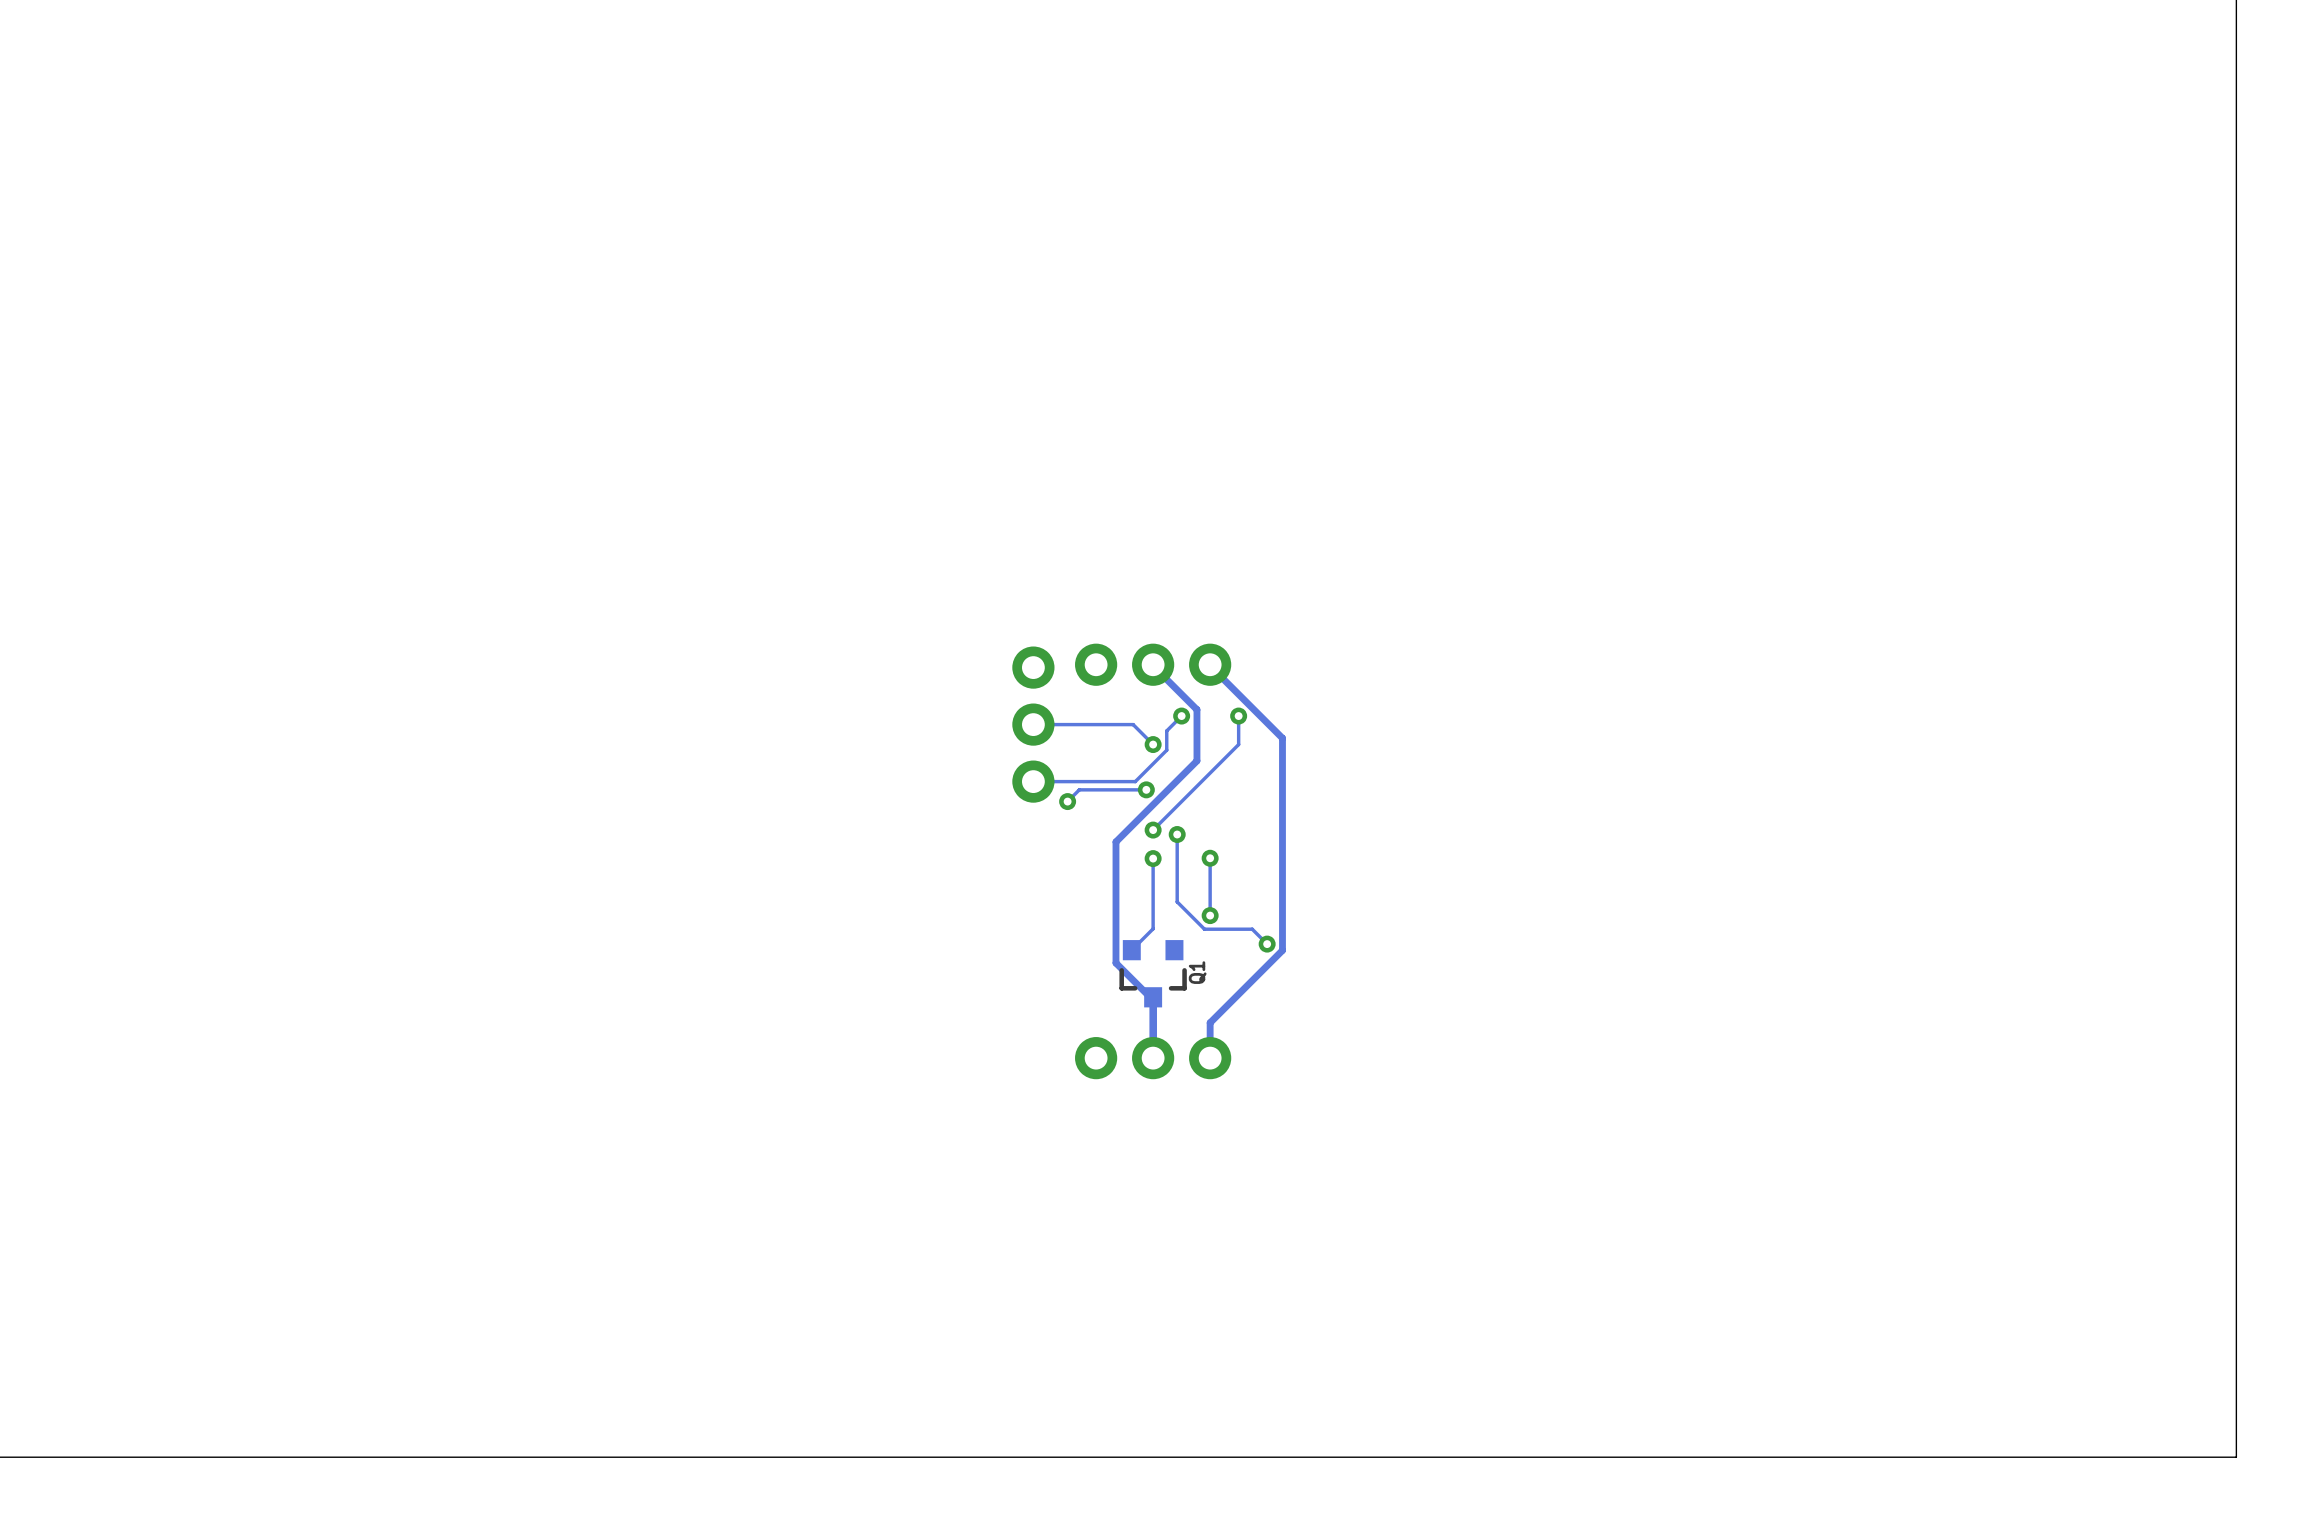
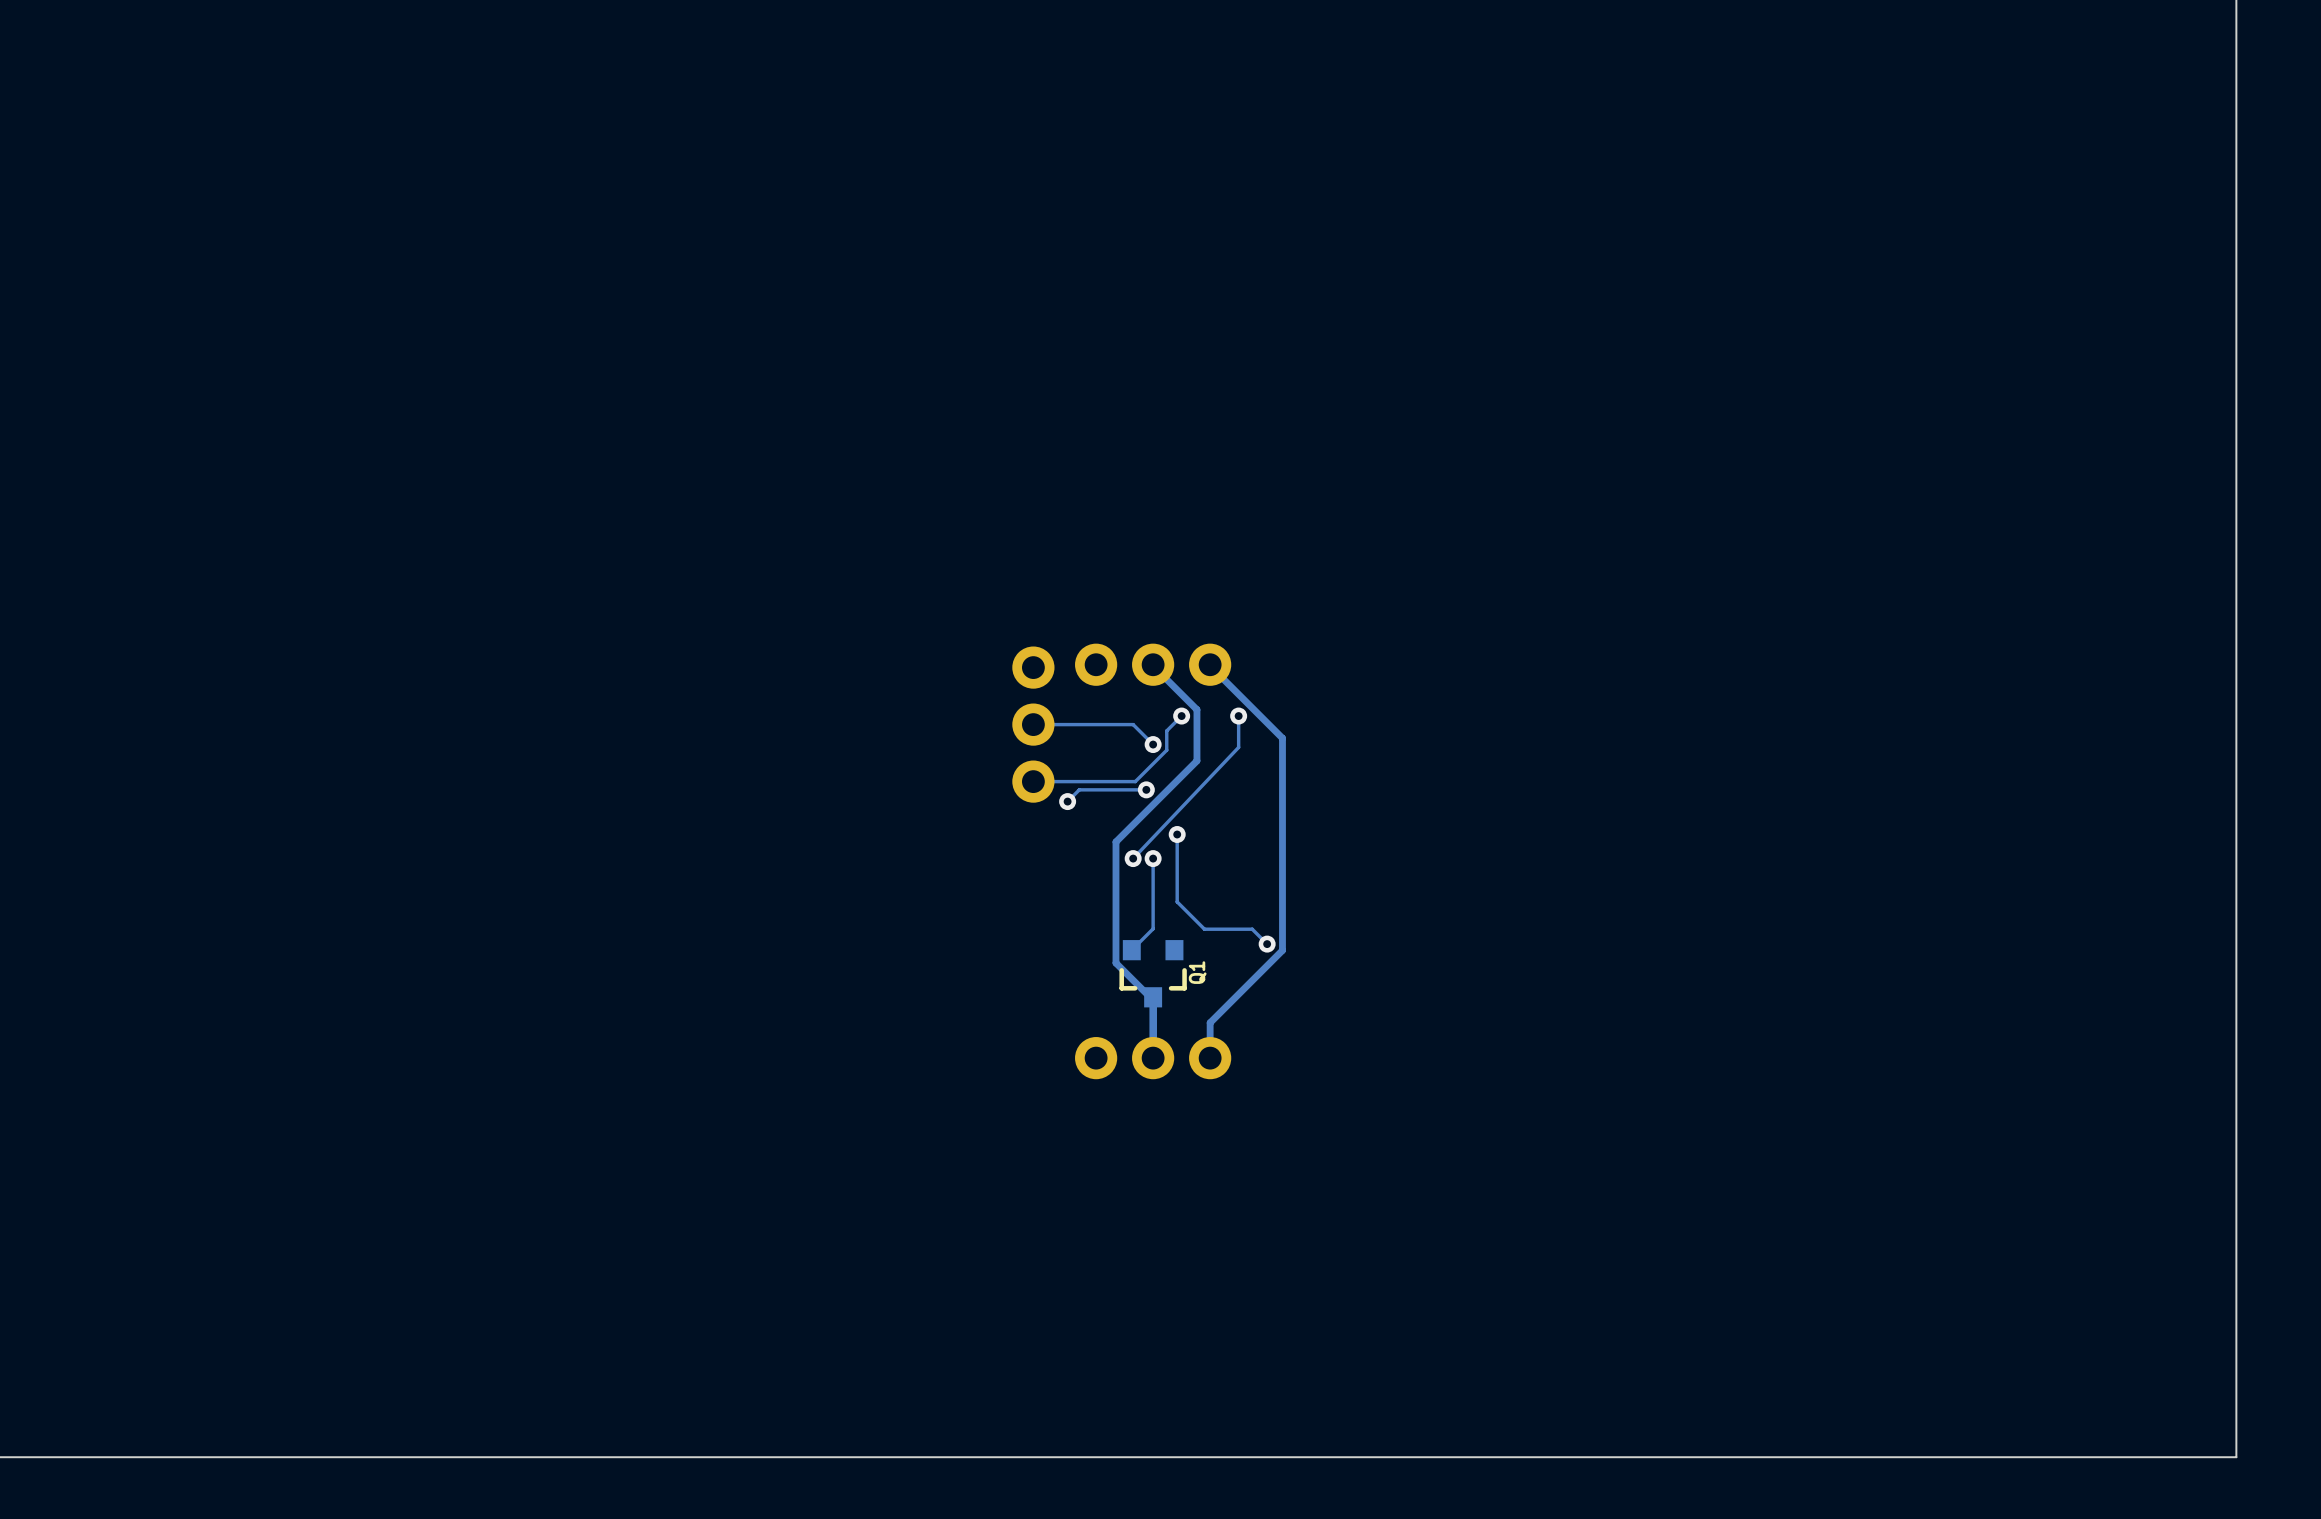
track: (1238, 744) (1153, 830) -> (1238, 744) (1238, 747) (1133, 858)
via position: (1153, 830) -> (1133, 858)
track: (1210, 858) (1210, 915) -> none
via: (1210, 858) -> none
via: (1210, 915) -> none

